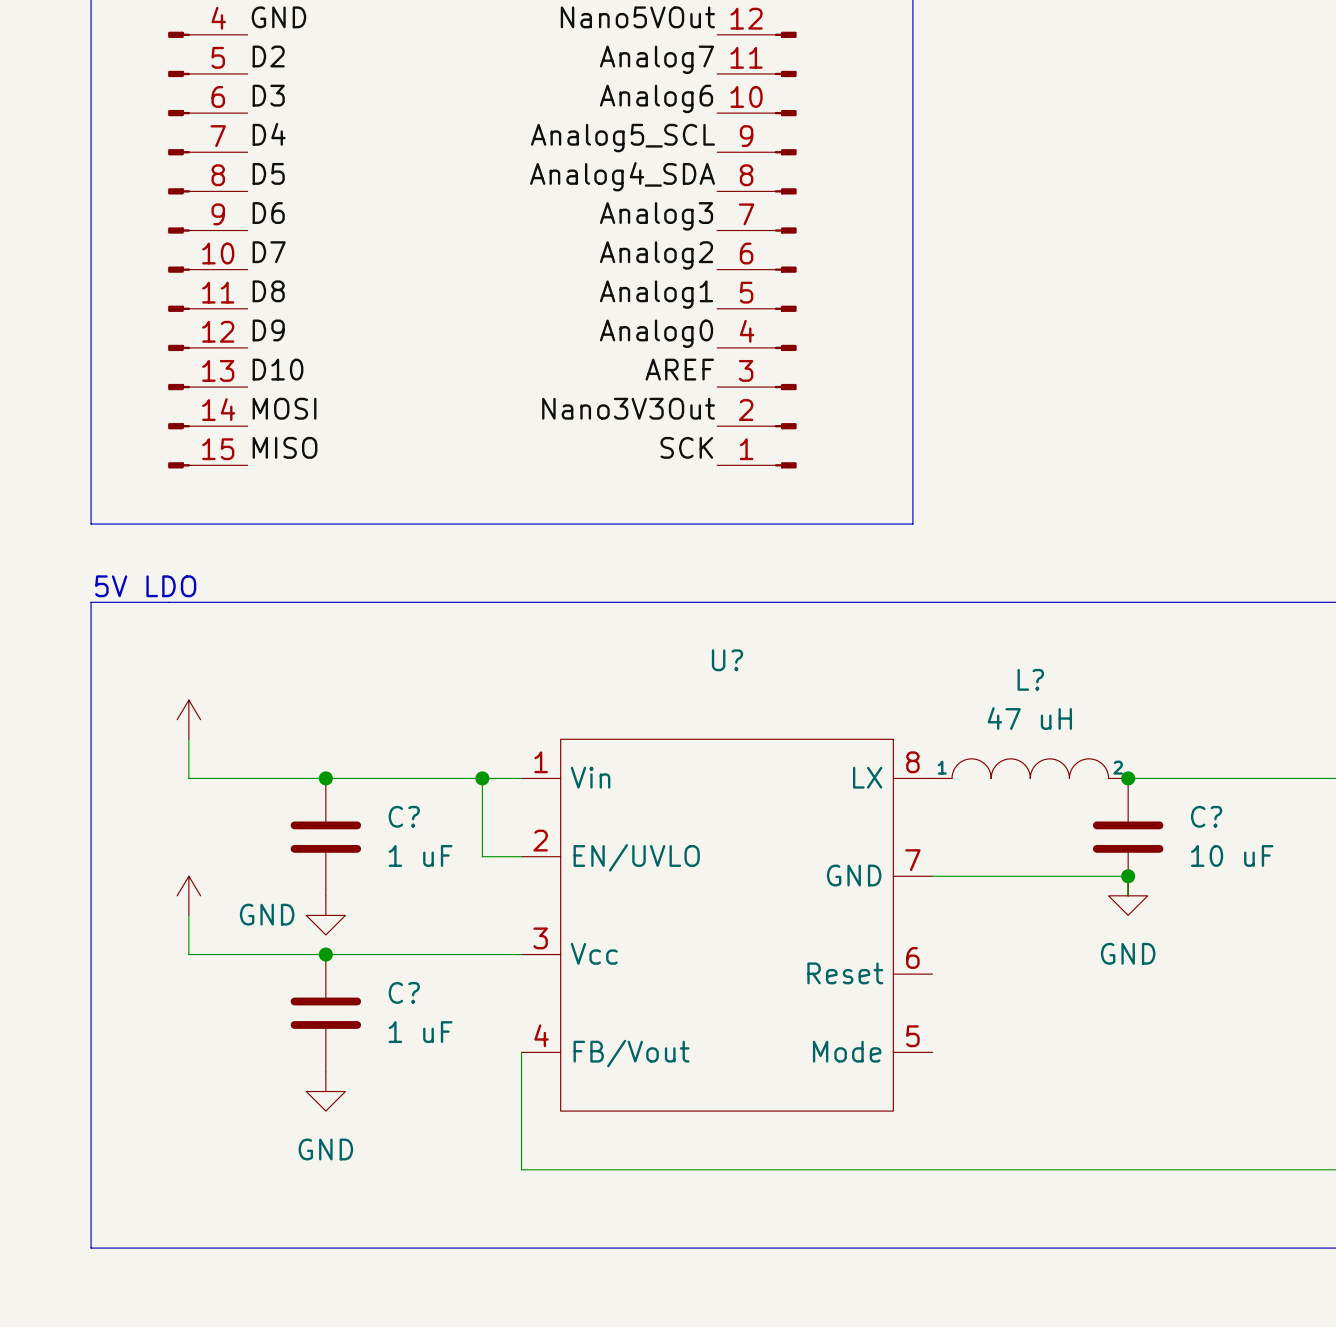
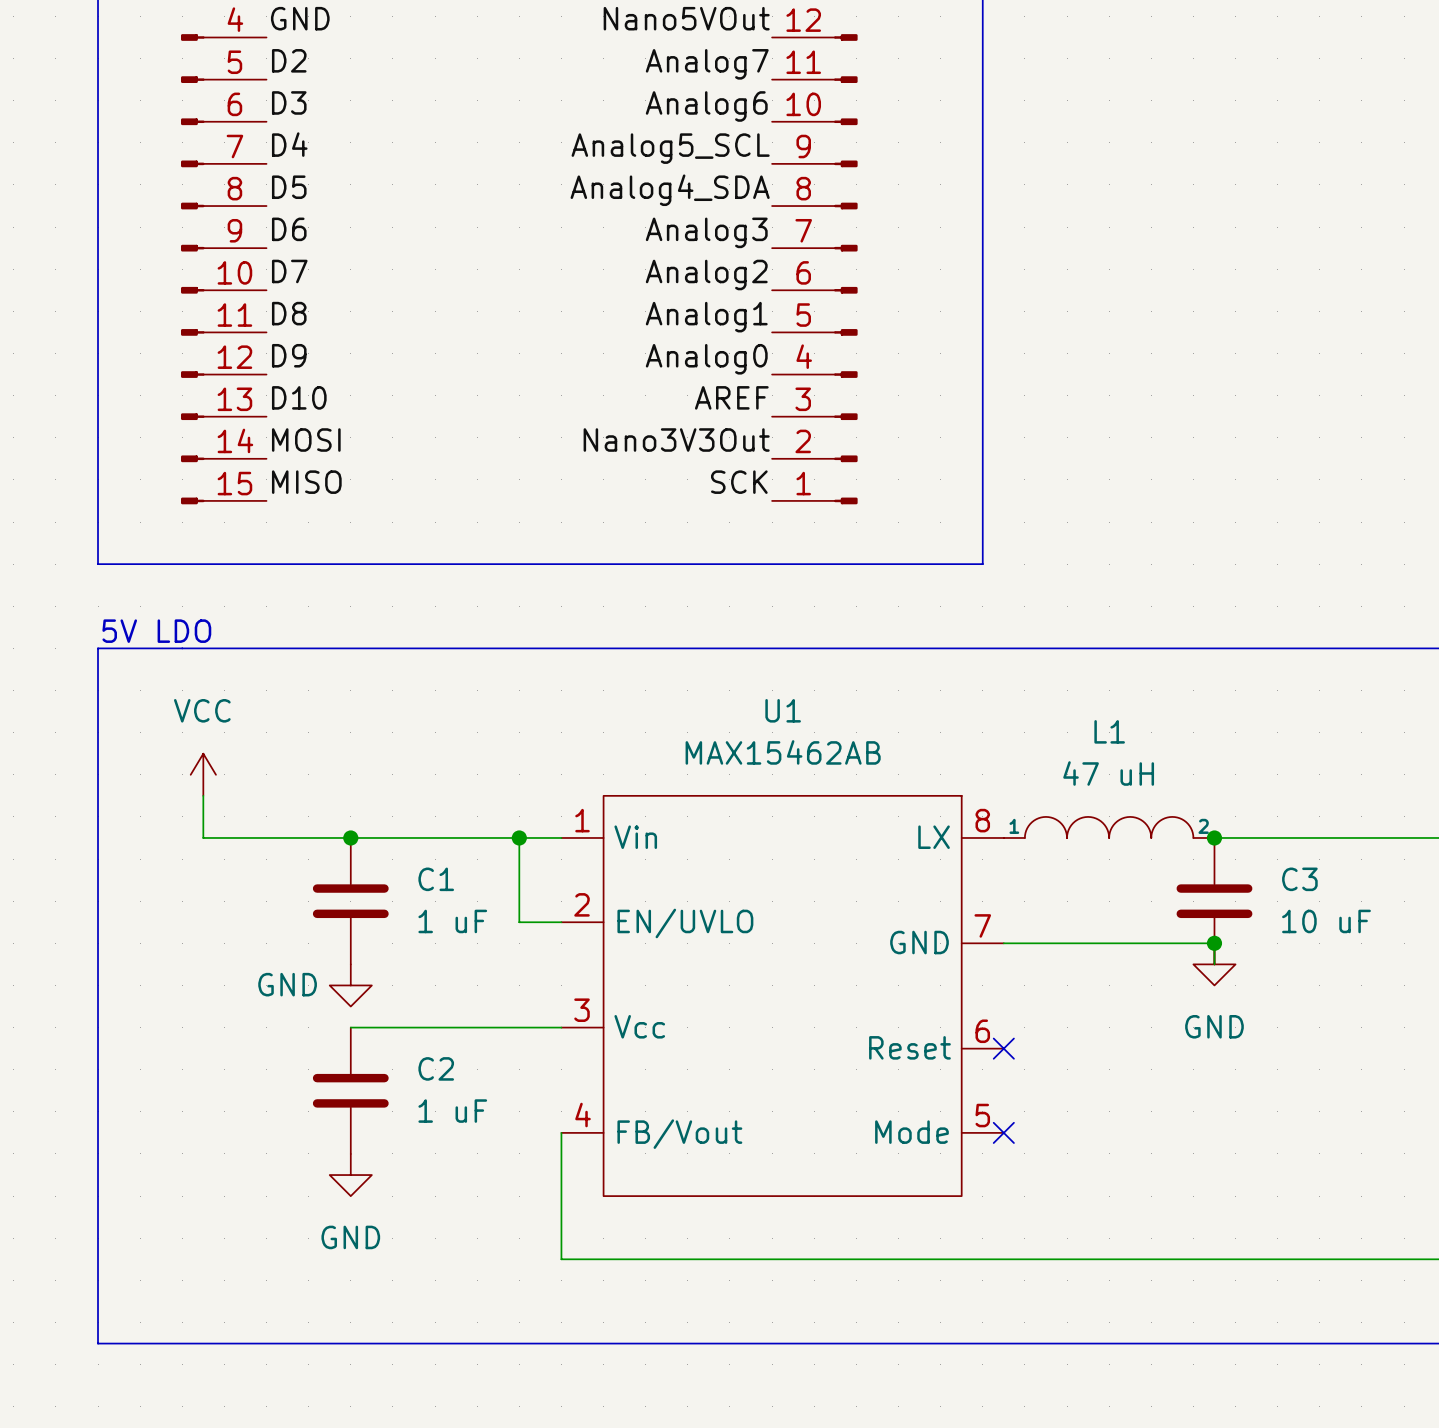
power symbol text: none -> VCC (202, 710)
U? name: U? (727, 660) -> U1 (783, 710)
L? name: L? (1030, 679) -> L1 (1109, 731)
U? value: none -> MAX15462AB (783, 752)
C? name: C? (404, 816) -> C1 (436, 879)
C? name: C? (1206, 816) -> C3 (1299, 879)
power symbol: (188, 895) -> none
wire: (188, 915) (188, 954) (325, 954) -> none
junction: (325, 954) -> none
no-connect mark: none -> (1003, 1048)
C? name: C? (404, 992) -> C2 (436, 1068)
no-connect mark: none -> (1003, 1132)

